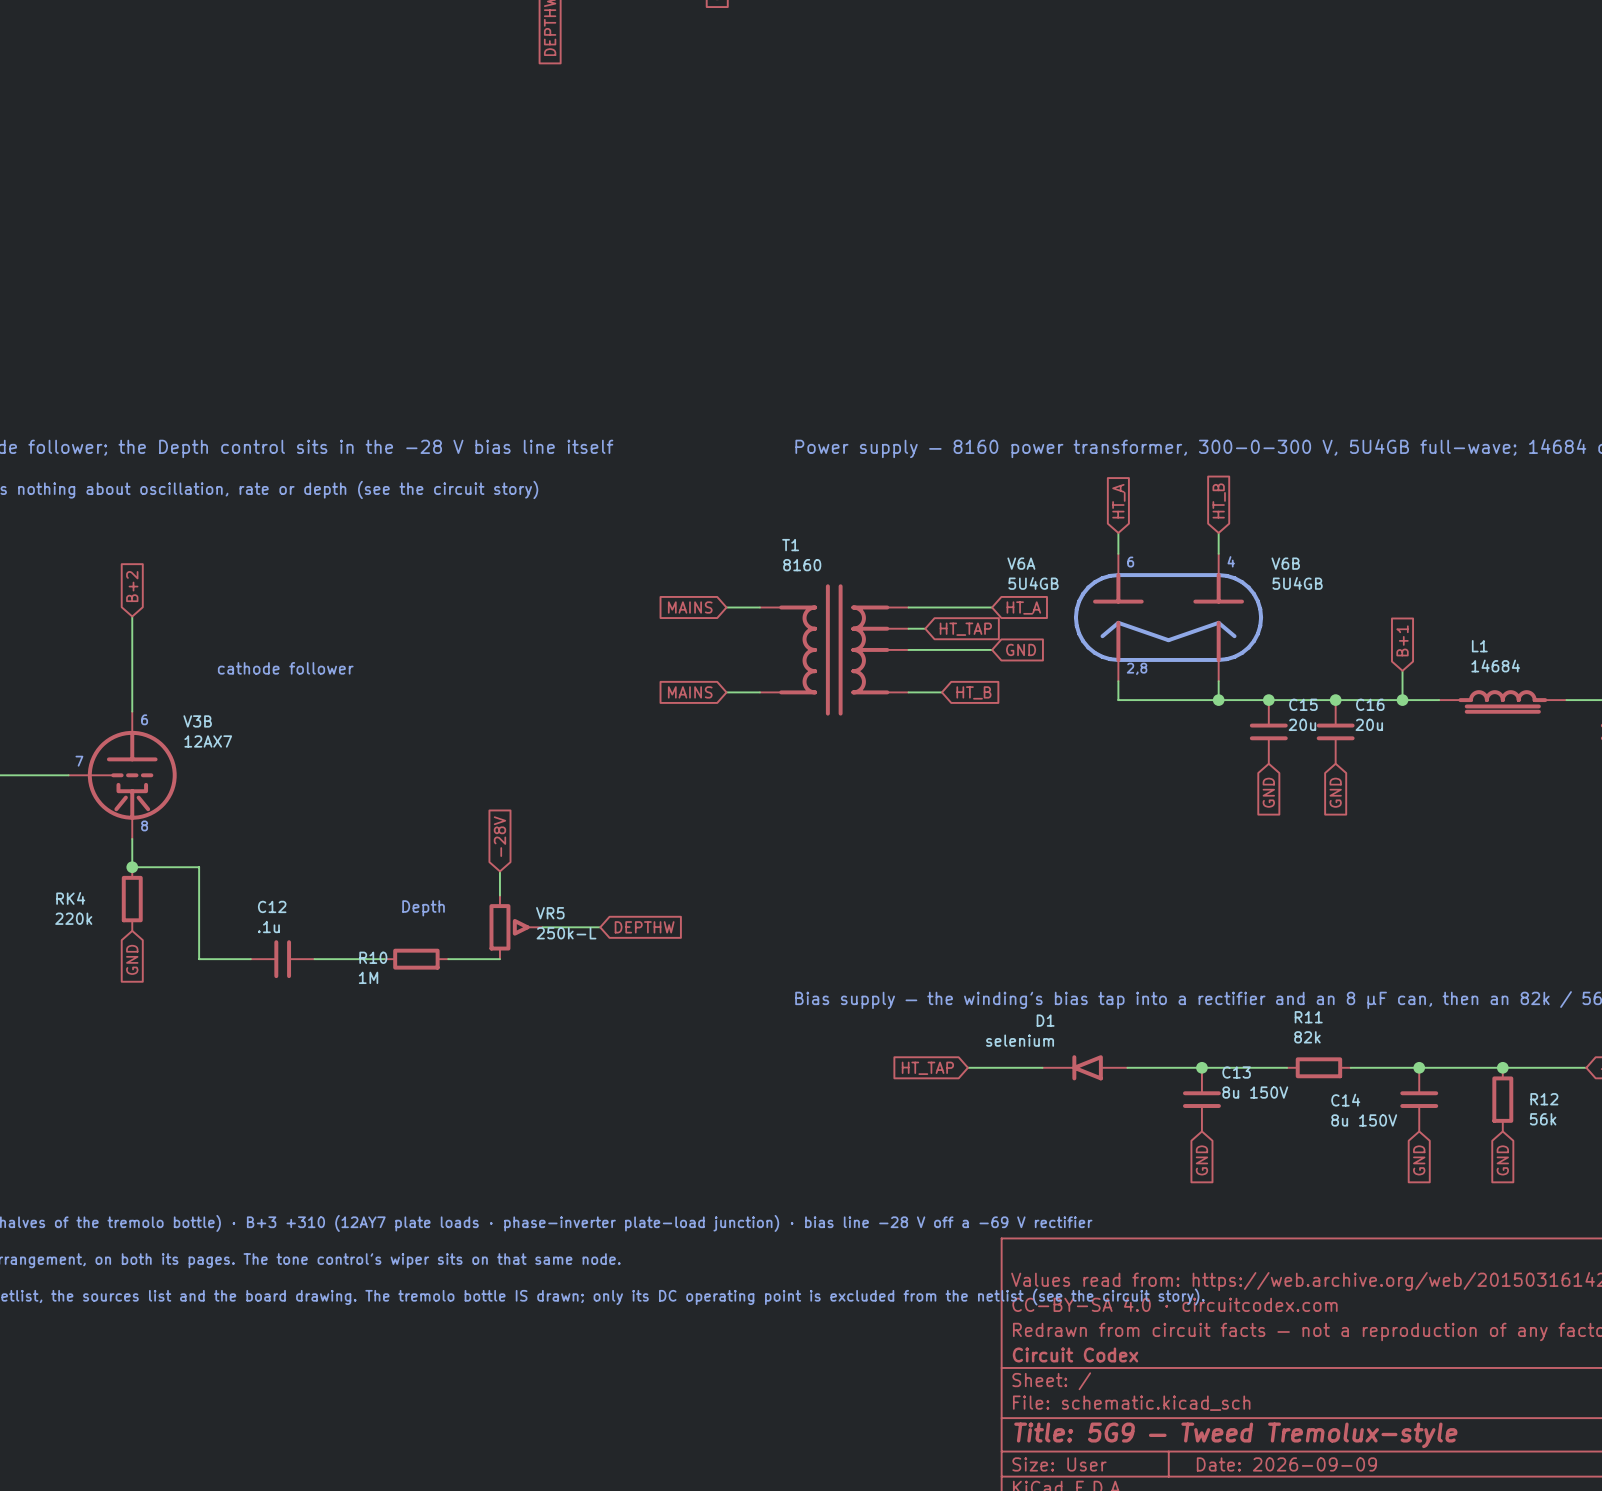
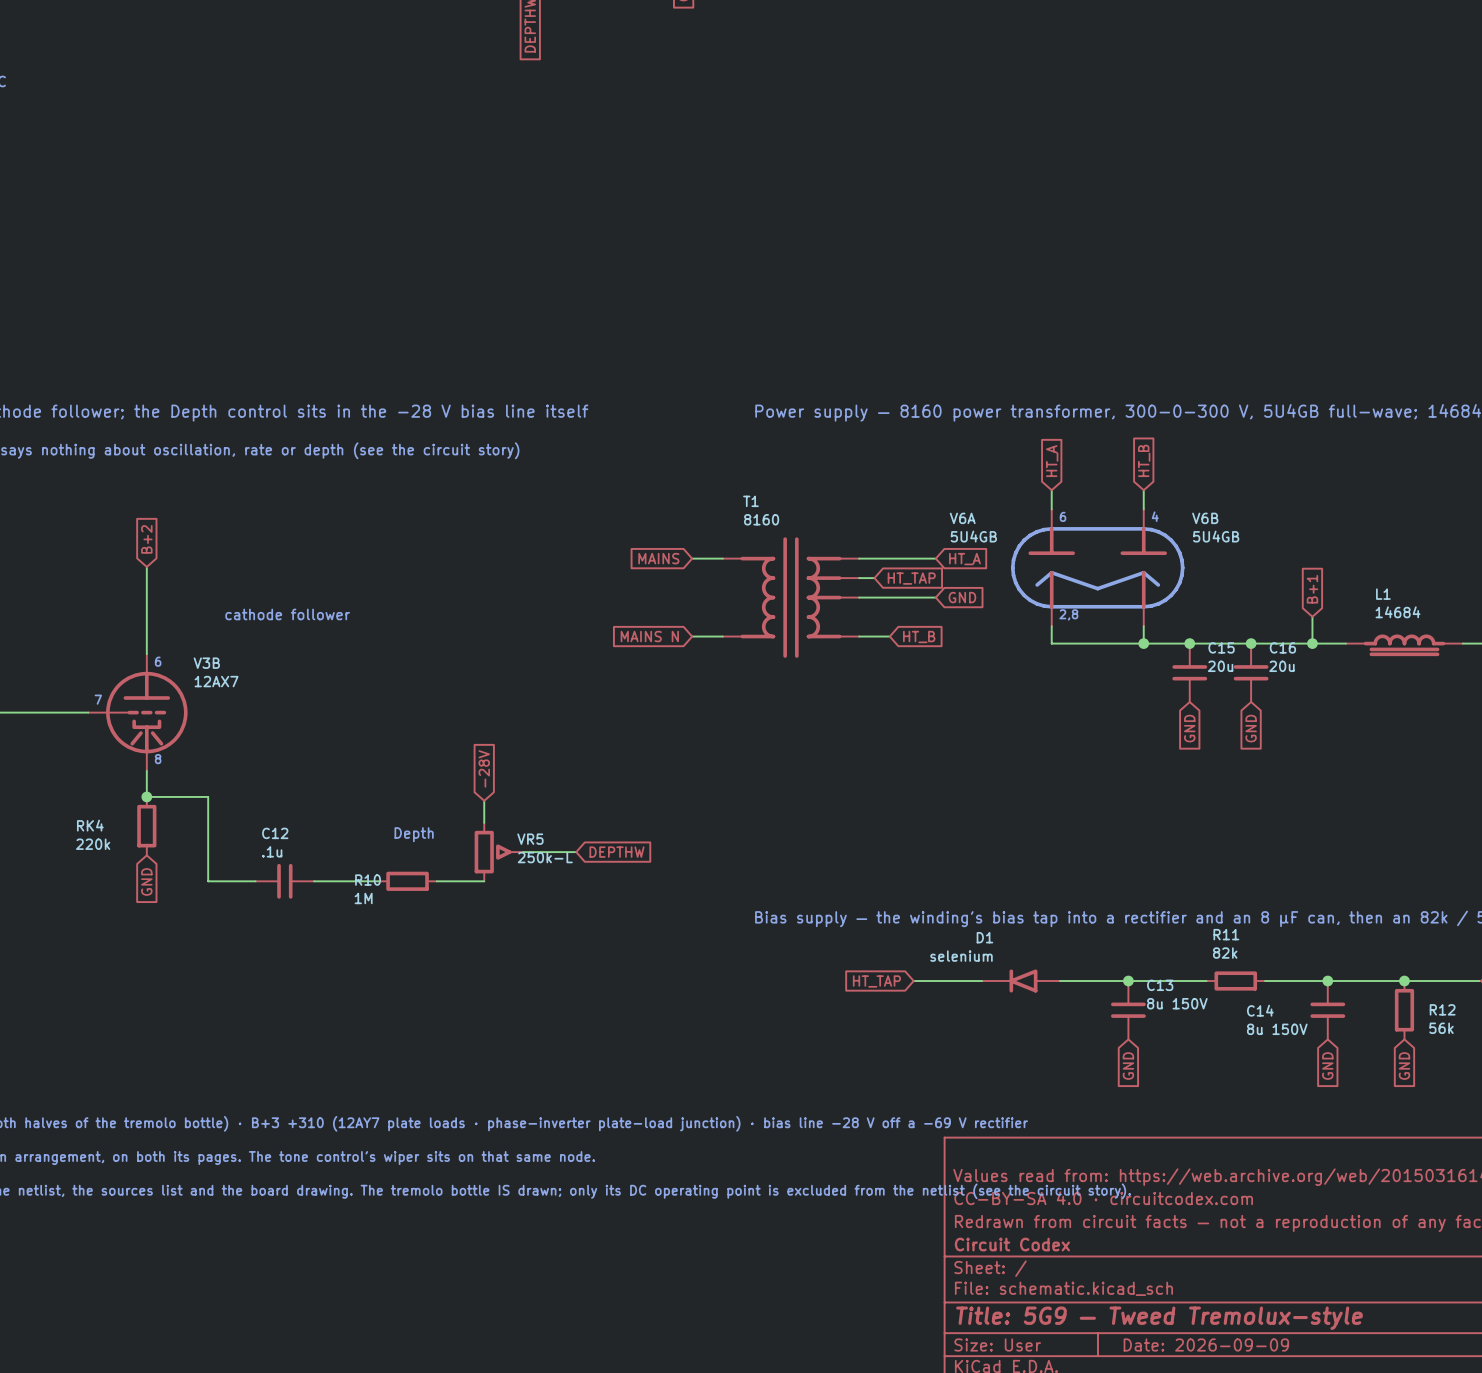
global label: MAINS (690, 692) -> MAINS N (649, 636)

